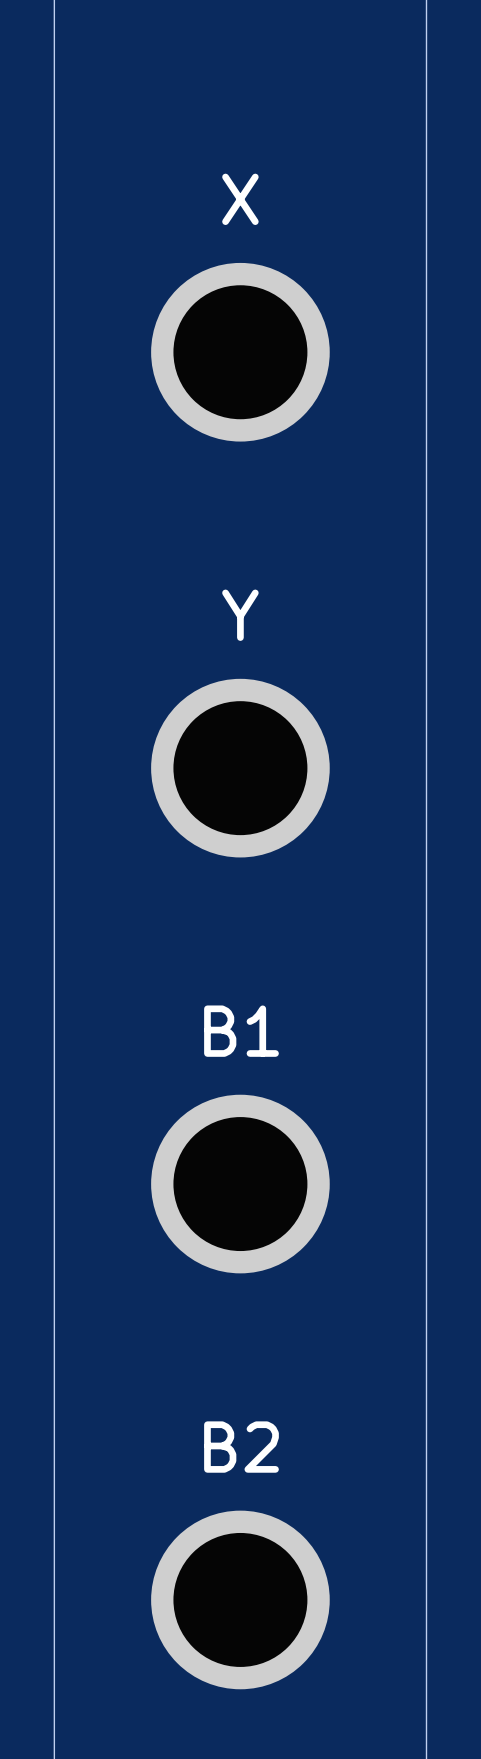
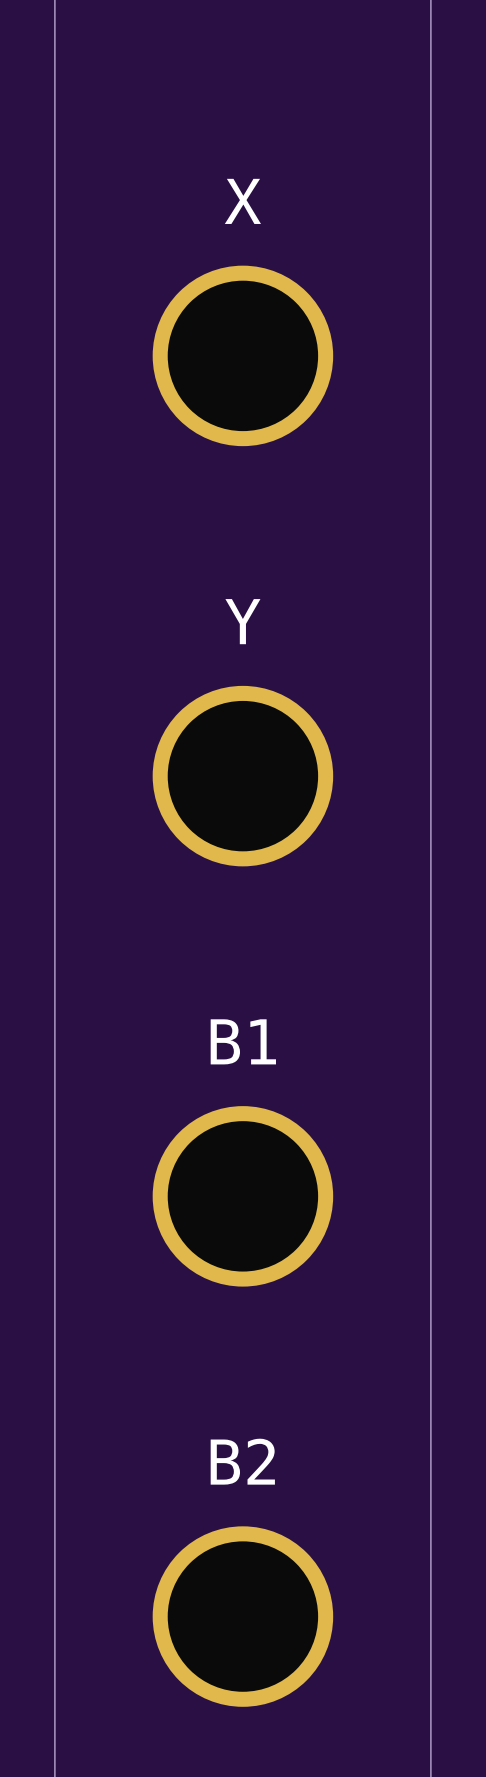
part footprint: [151, 262, 330, 442] -> [152, 265, 334, 447]
part footprint: [151, 678, 330, 858] -> [152, 685, 334, 867]
part footprint: [151, 1094, 330, 1274] -> [152, 1106, 334, 1287]
part footprint: [151, 1510, 330, 1690] -> [152, 1526, 334, 1707]

